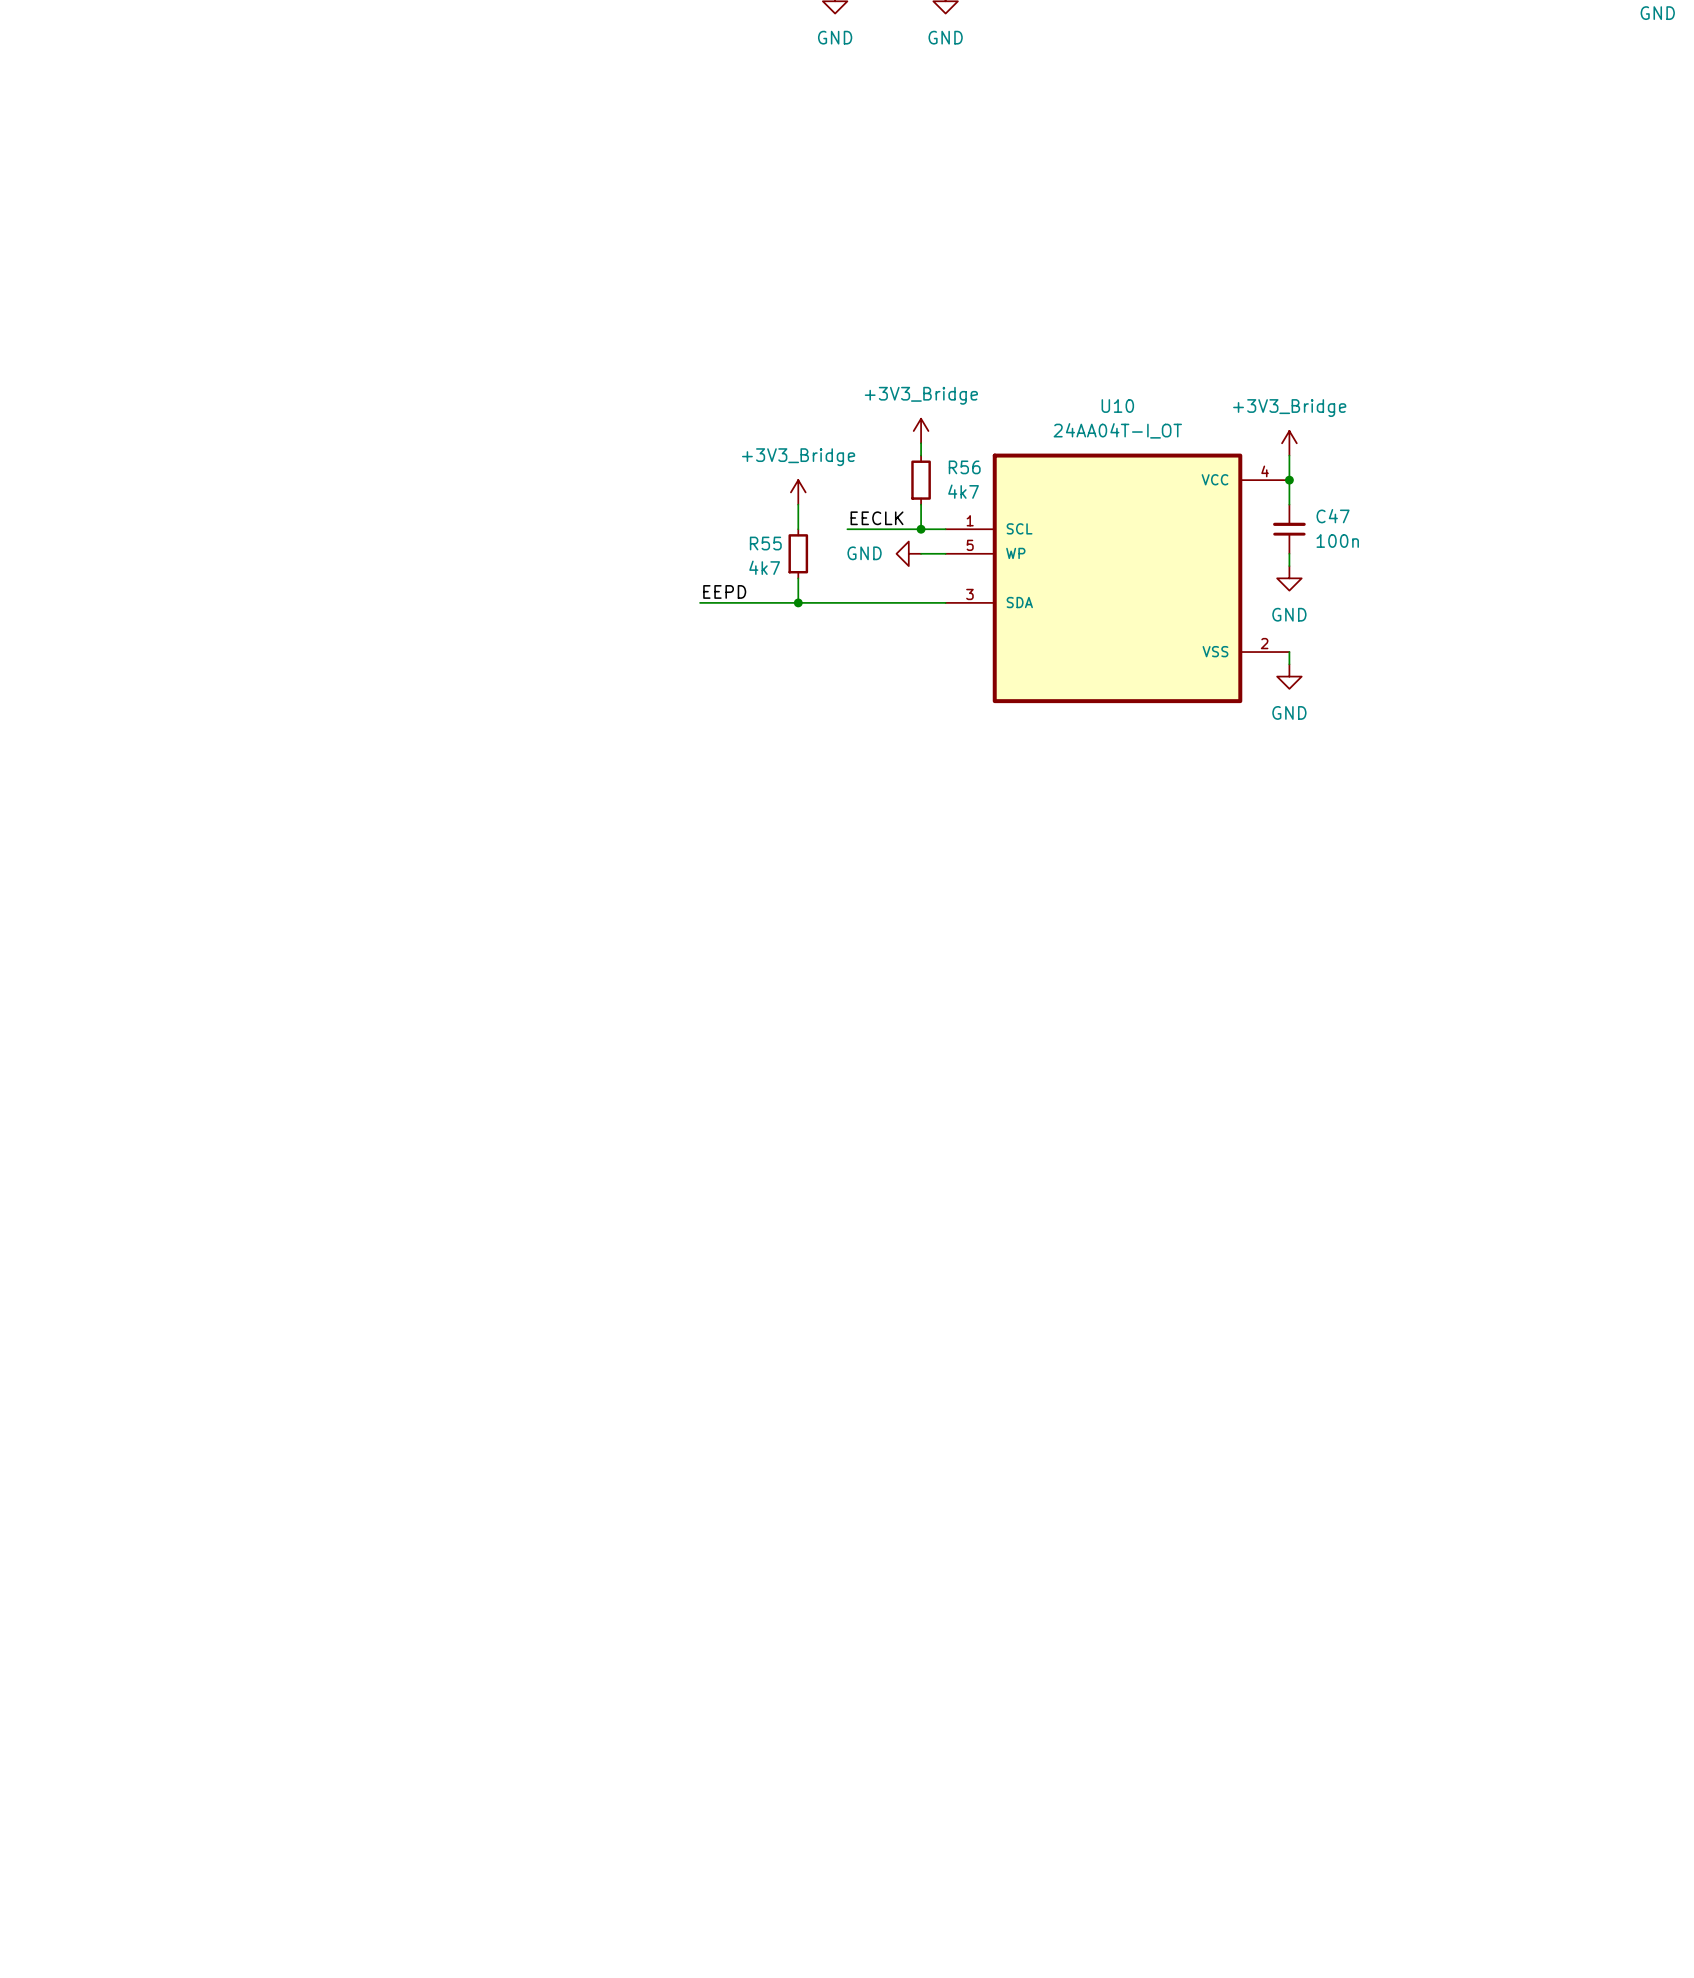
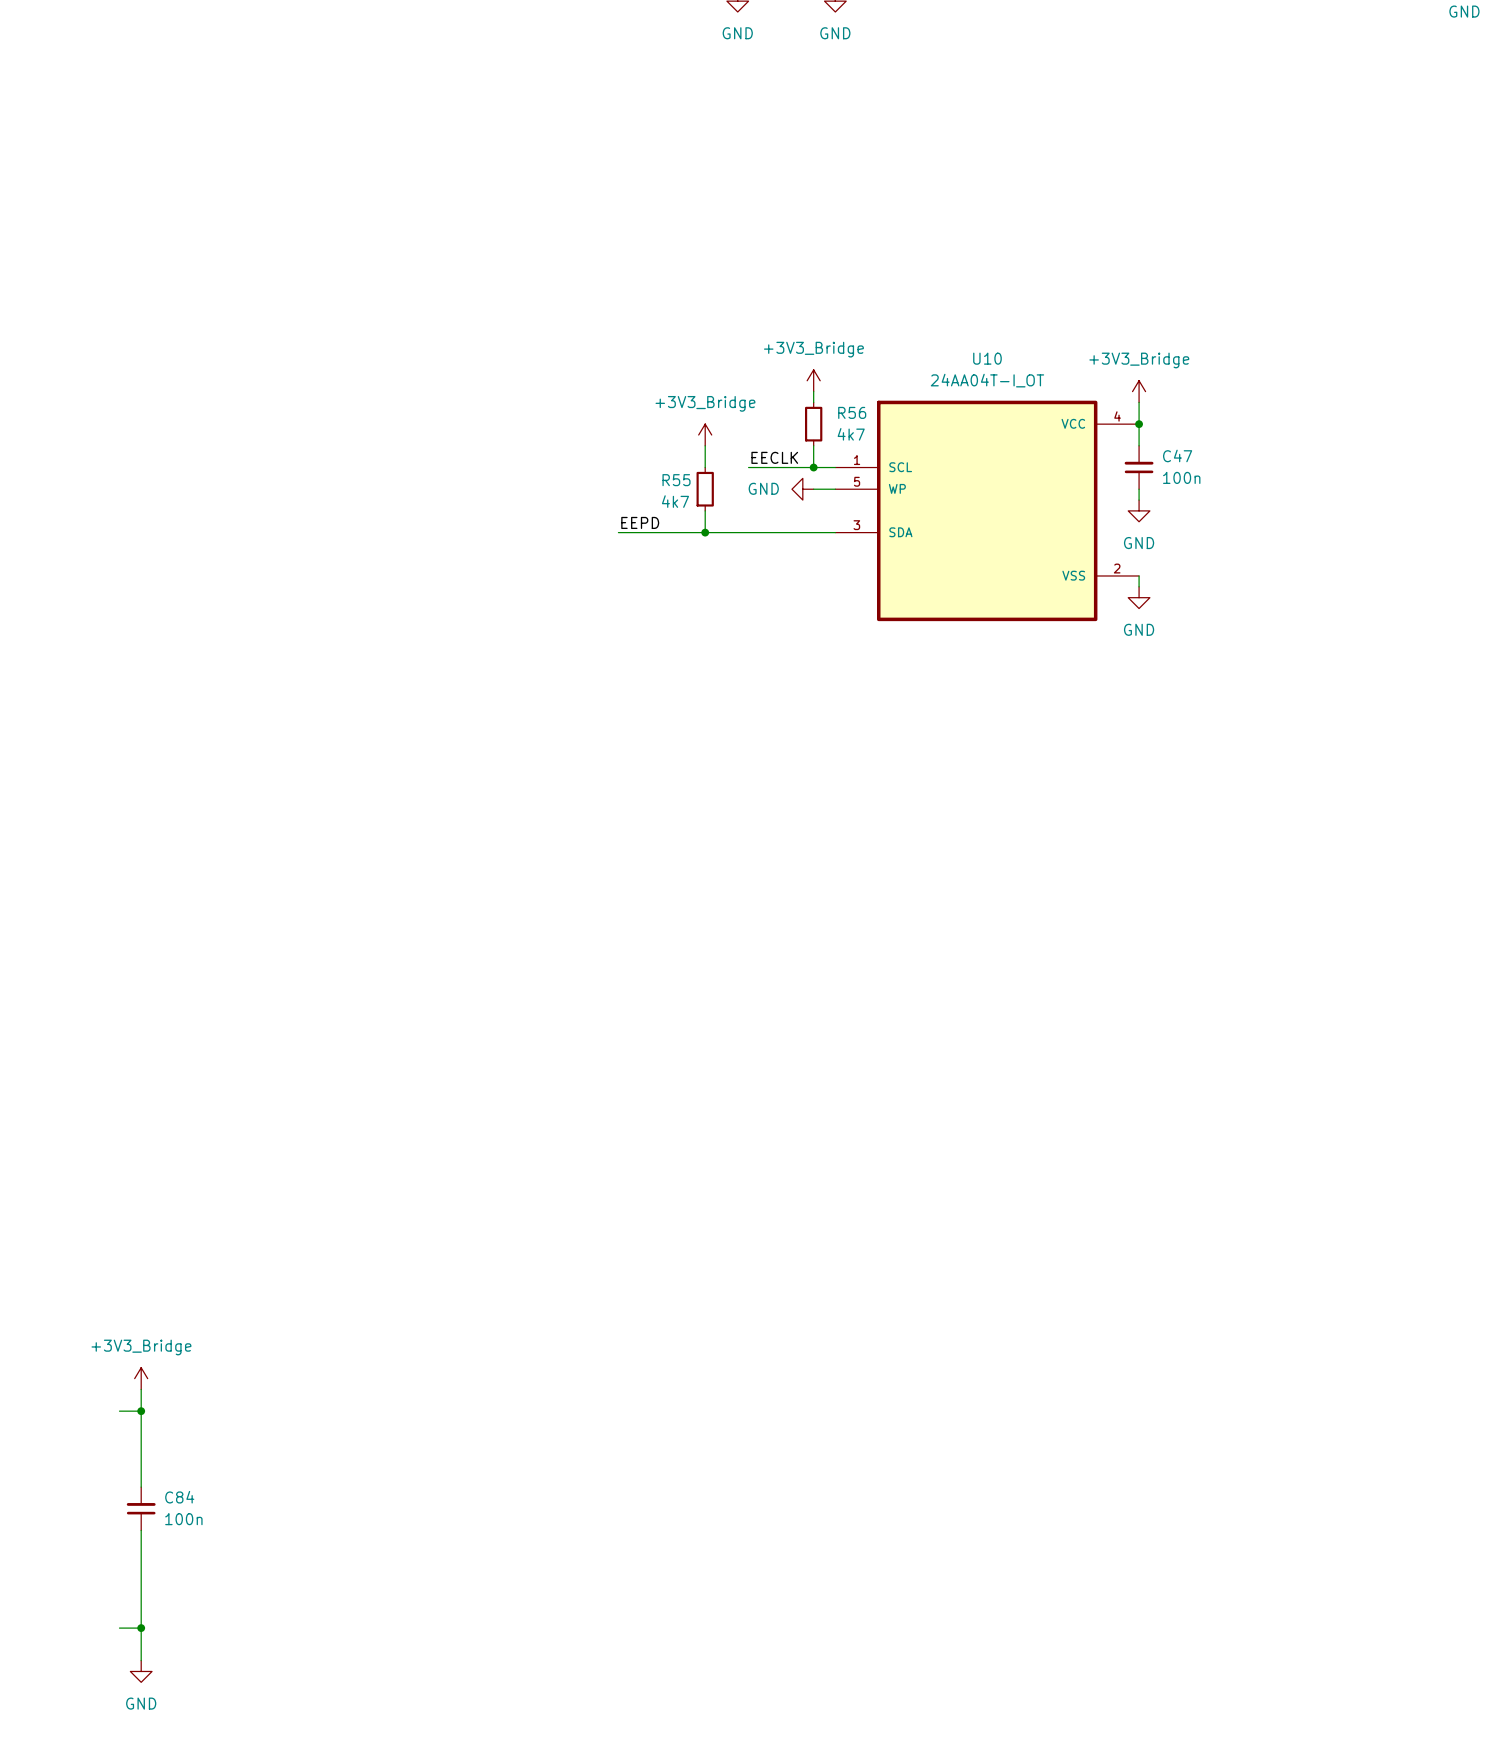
power symbol: none -> +3V3_Bridge (141, 1378)
wire: none -> (141, 1389) (141, 1487)
wire: none -> (119, 1411) (141, 1411)
junction: none -> (141, 1411)
C84: none -> (141, 1508)
wire: none -> (141, 1530) (141, 1660)
wire: none -> (119, 1628) (141, 1628)
junction: none -> (141, 1628)
power symbol: none -> GND (141, 1671)

